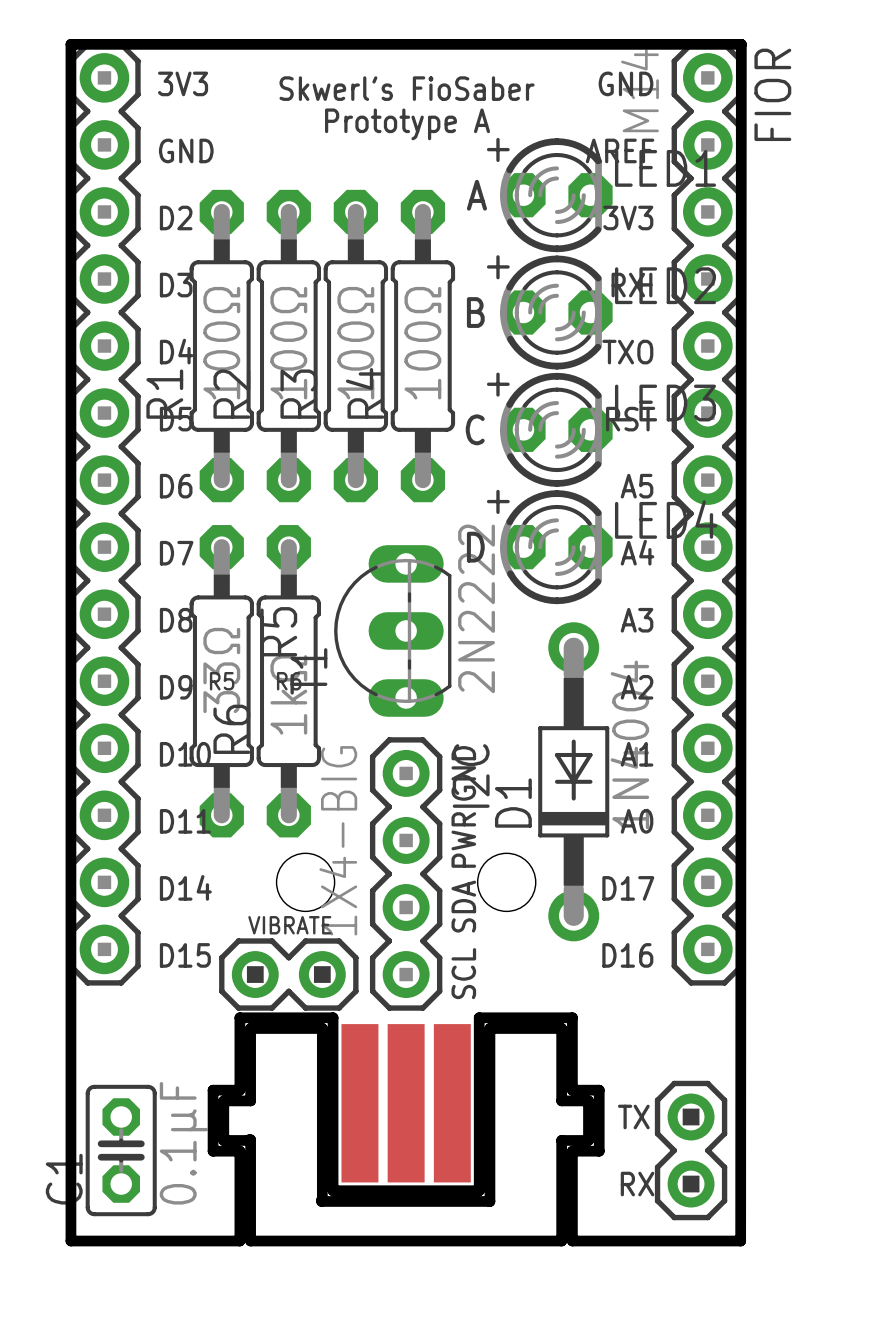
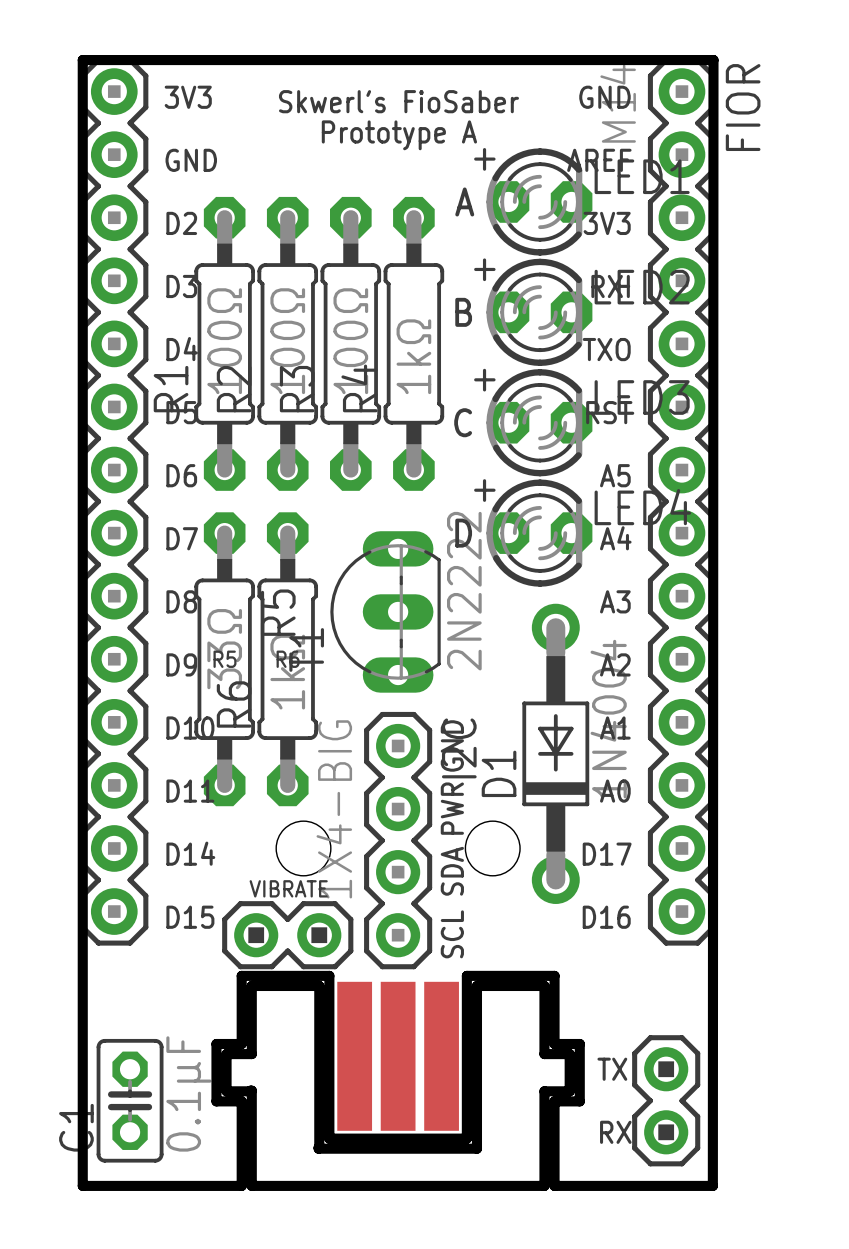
R4 value: 100Ω (422, 343) -> 1kΩ (413, 356)

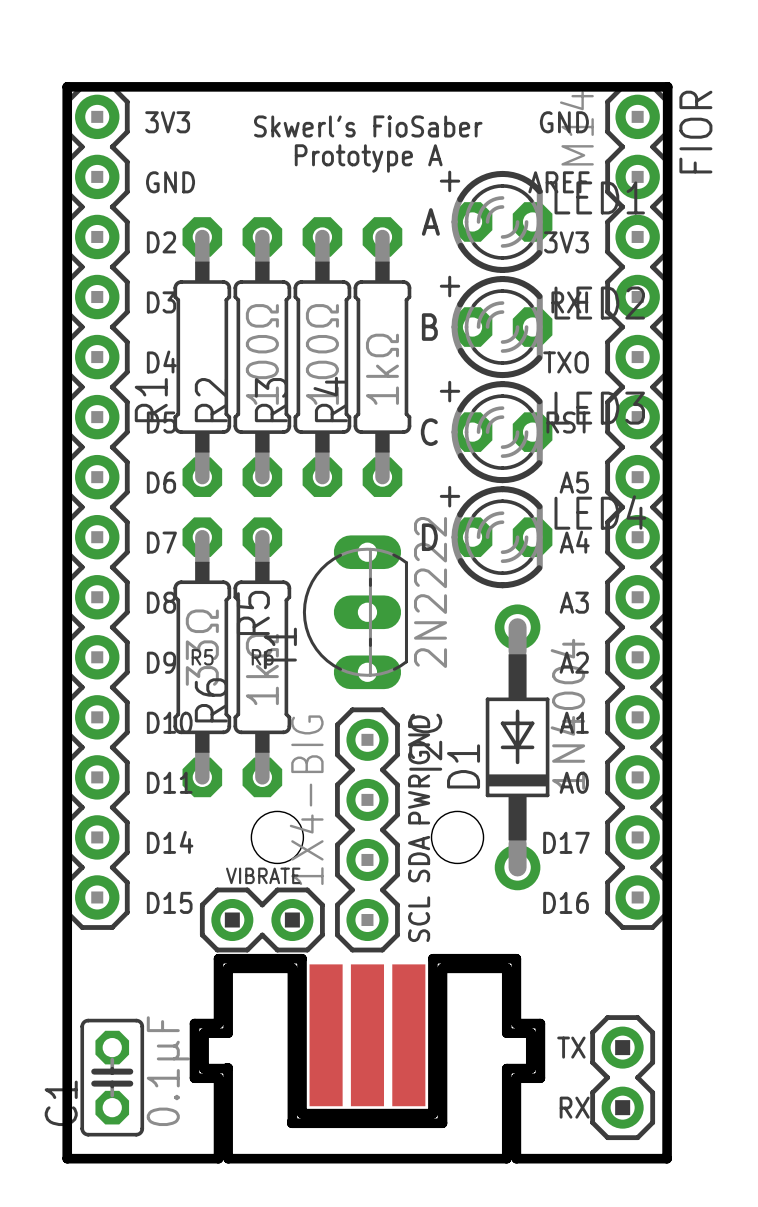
R1 value: 100Ω (224, 341) -> none

